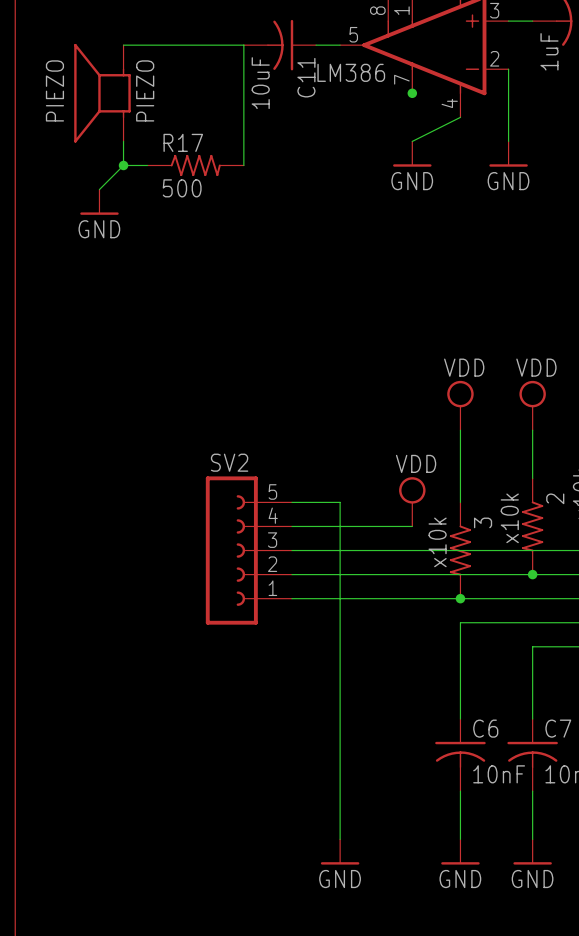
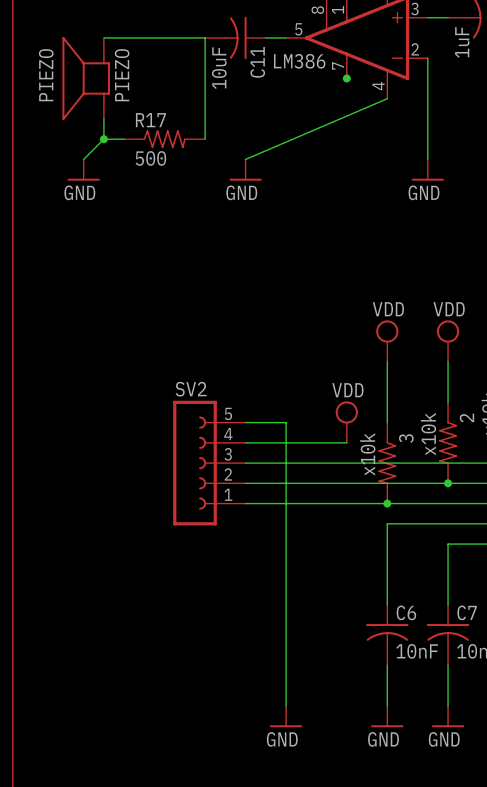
wire: (460, 117) (412, 141) -> (387, 98) (245, 159)
power symbol: GND (412, 154) -> none
power symbol position: GND (508, 154) -> GND (427, 170)
power symbol: none -> GND (245, 170)

